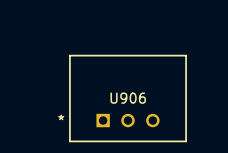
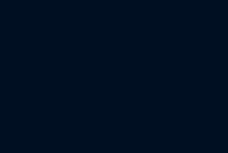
U906: (128, 98) -> none

